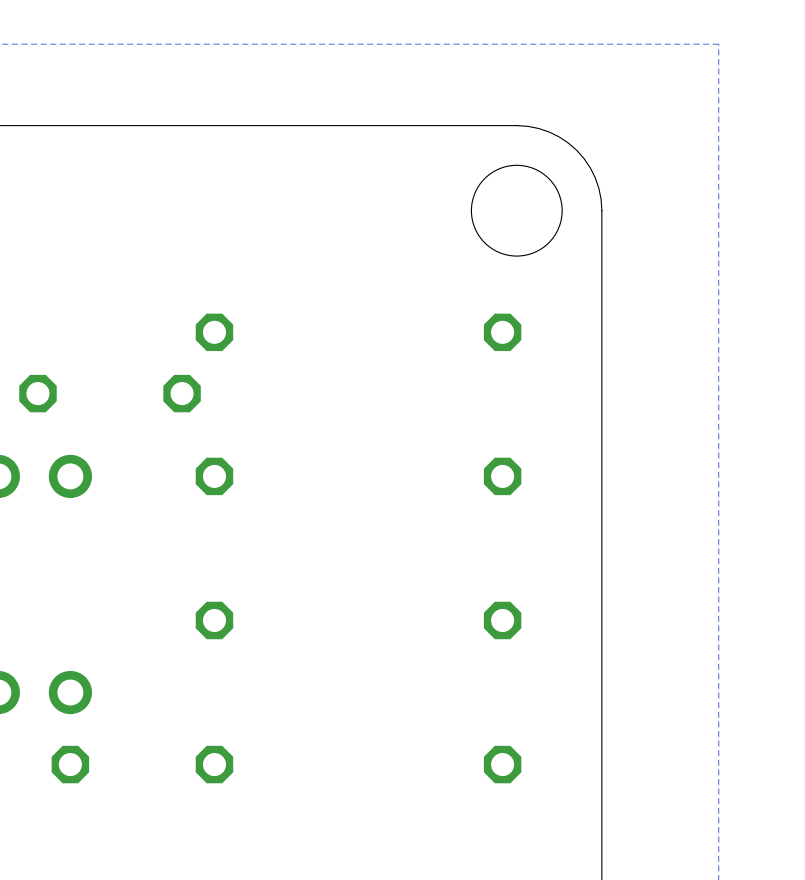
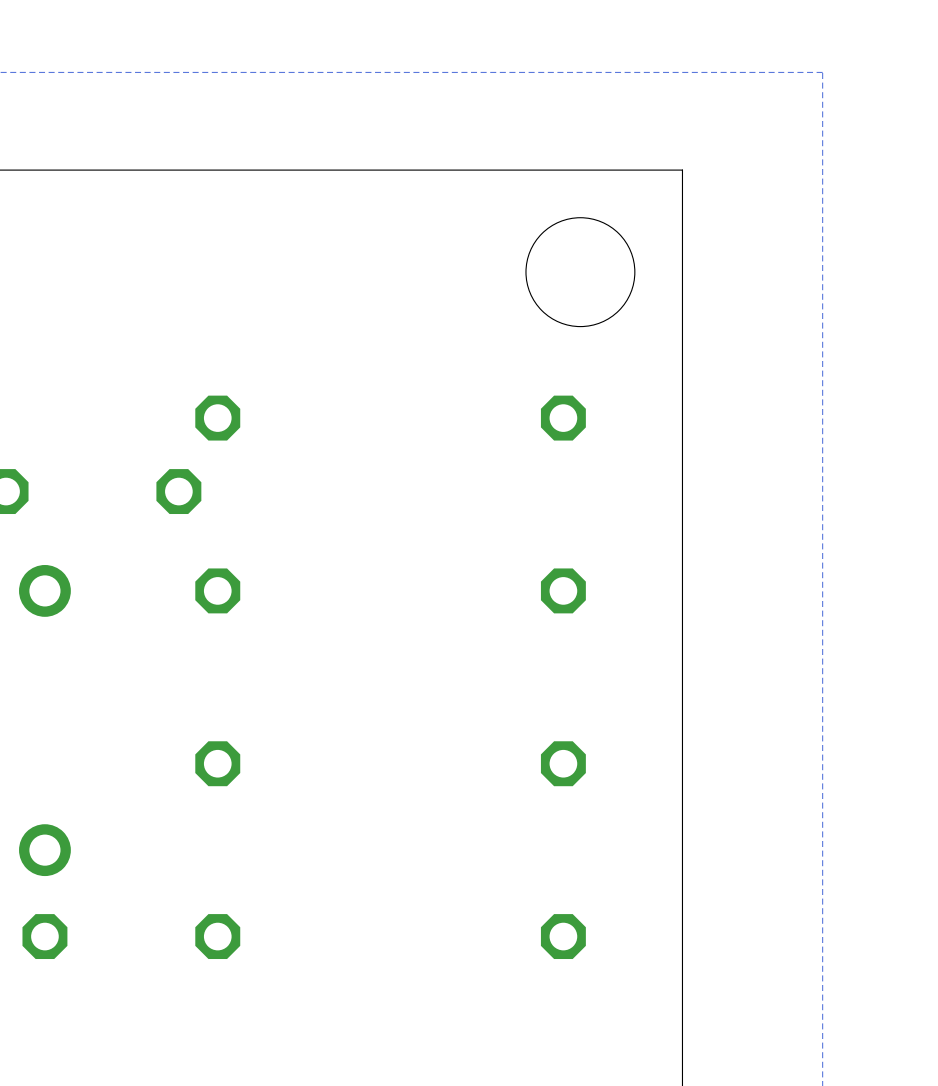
board edge: (516, 125) (549, 132) (576, 150) (595, 178) (601, 210) -> (580, 170) (682, 170) (682, 272)

